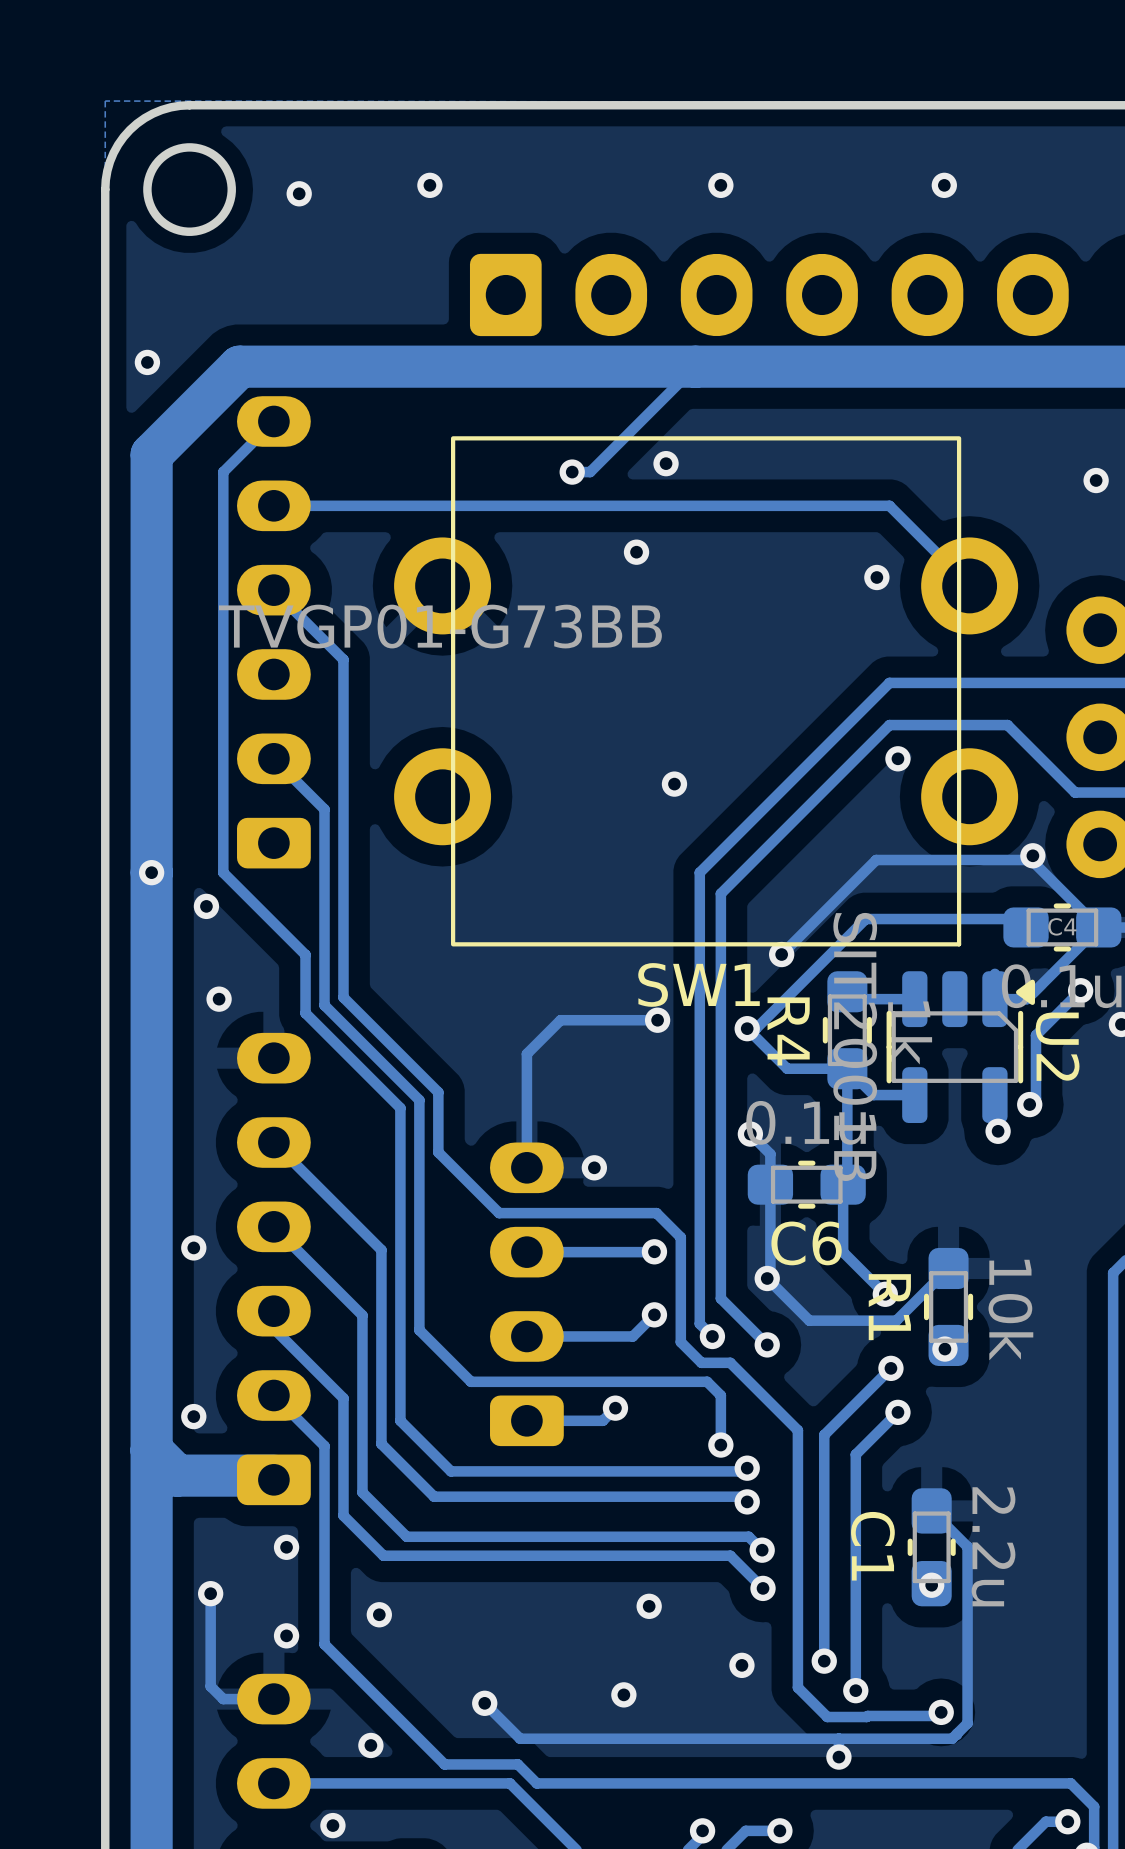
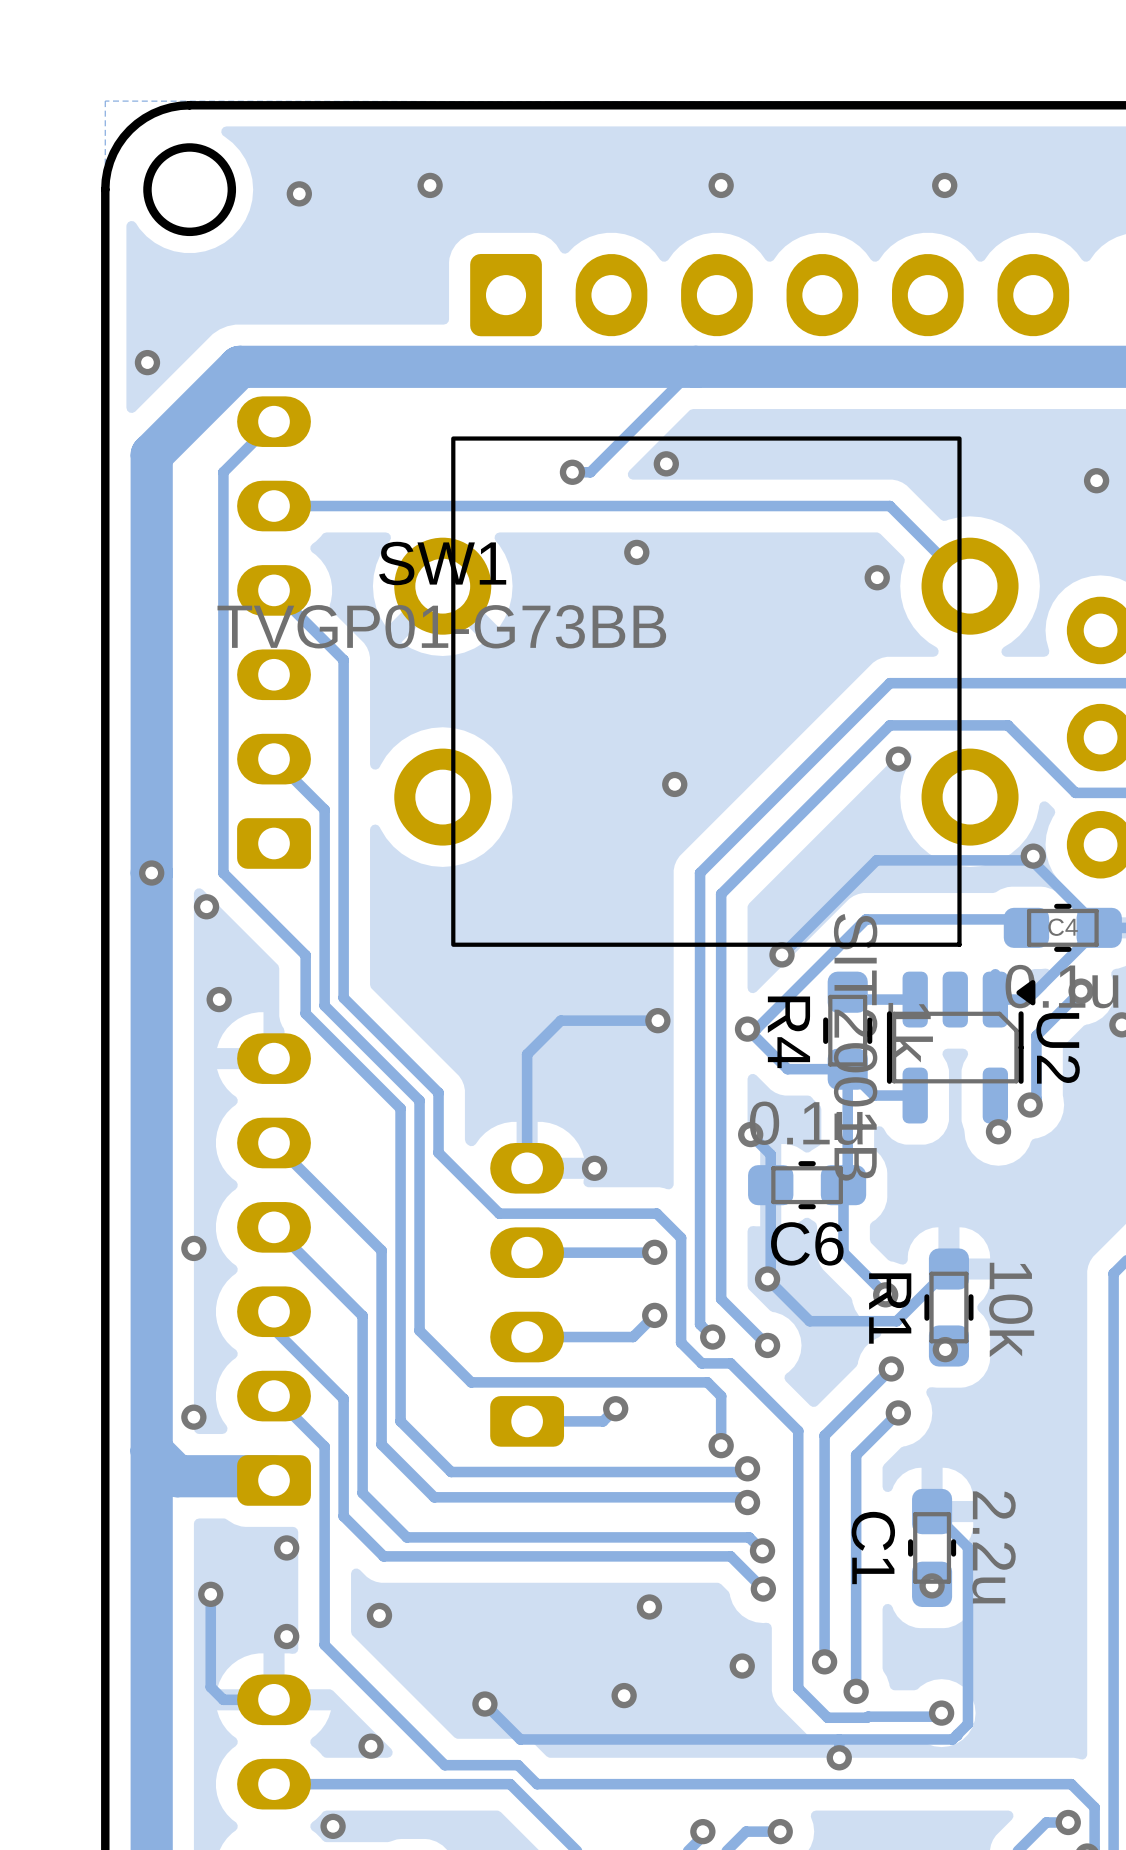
SW1 name position: SW1 (699, 984) -> SW1 (442, 563)

